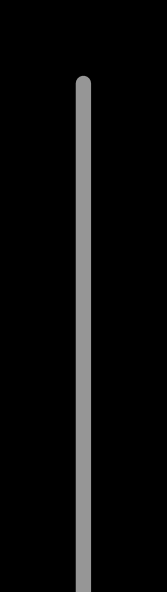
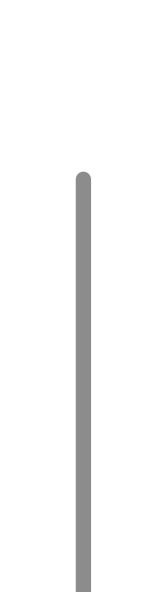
line: (83, 83) (83, 179) -> none

